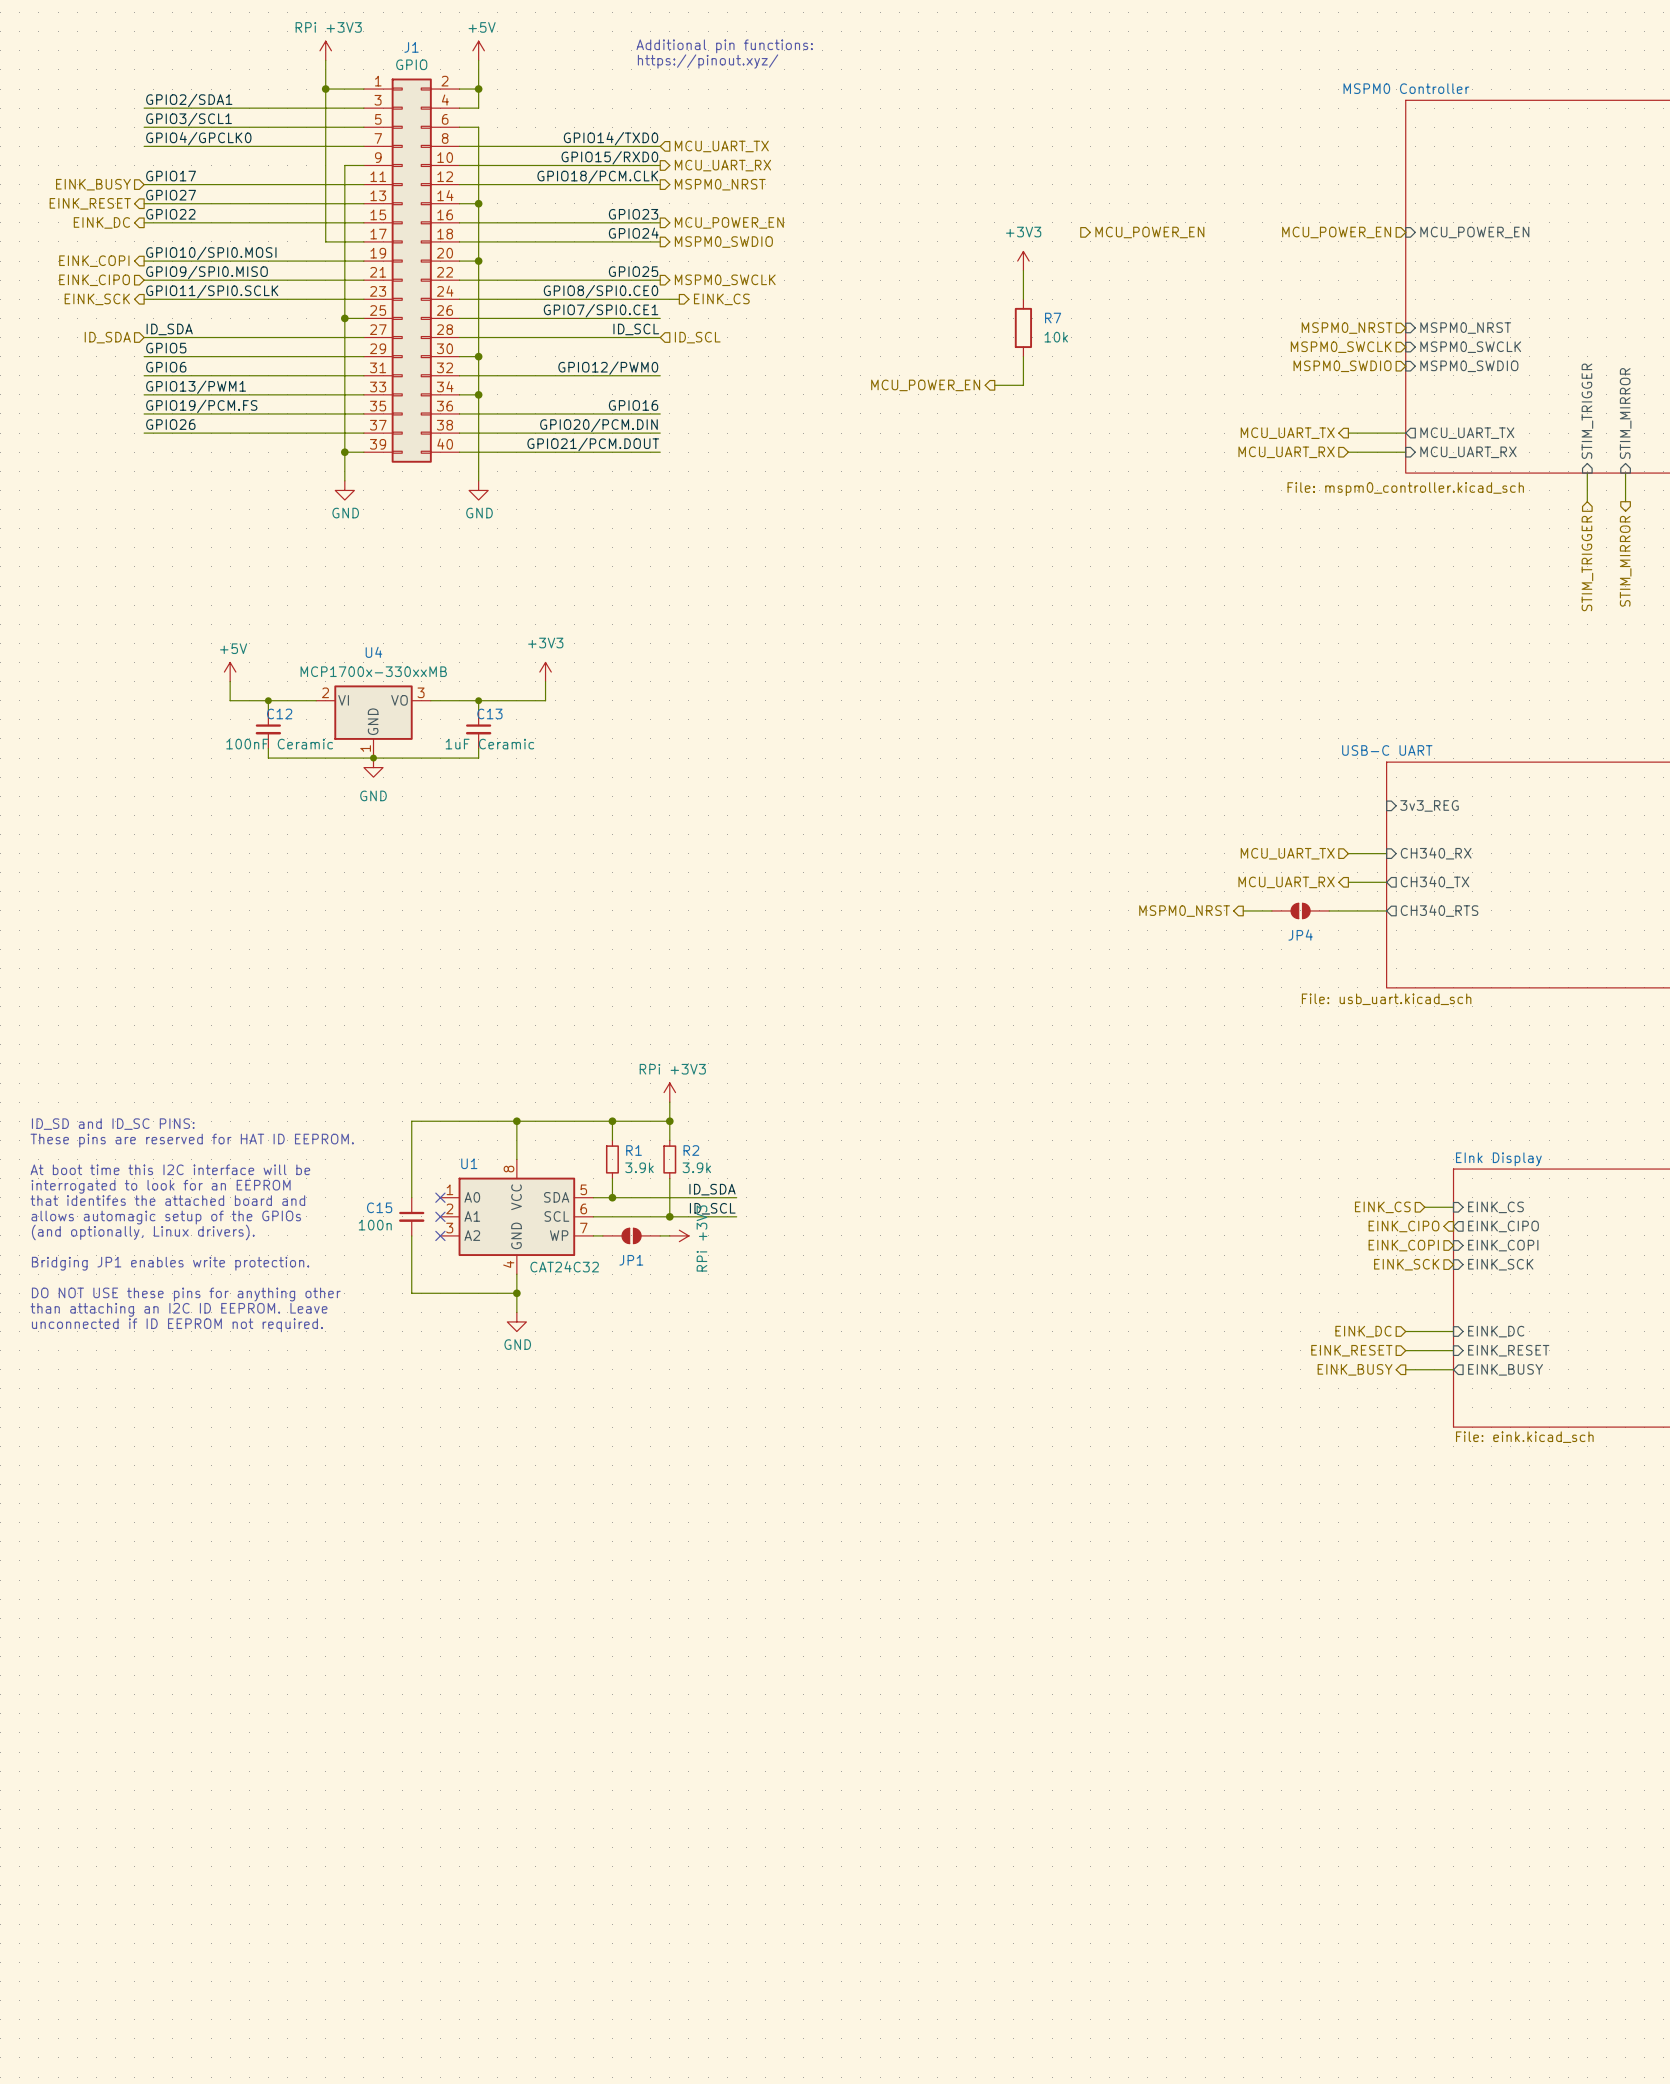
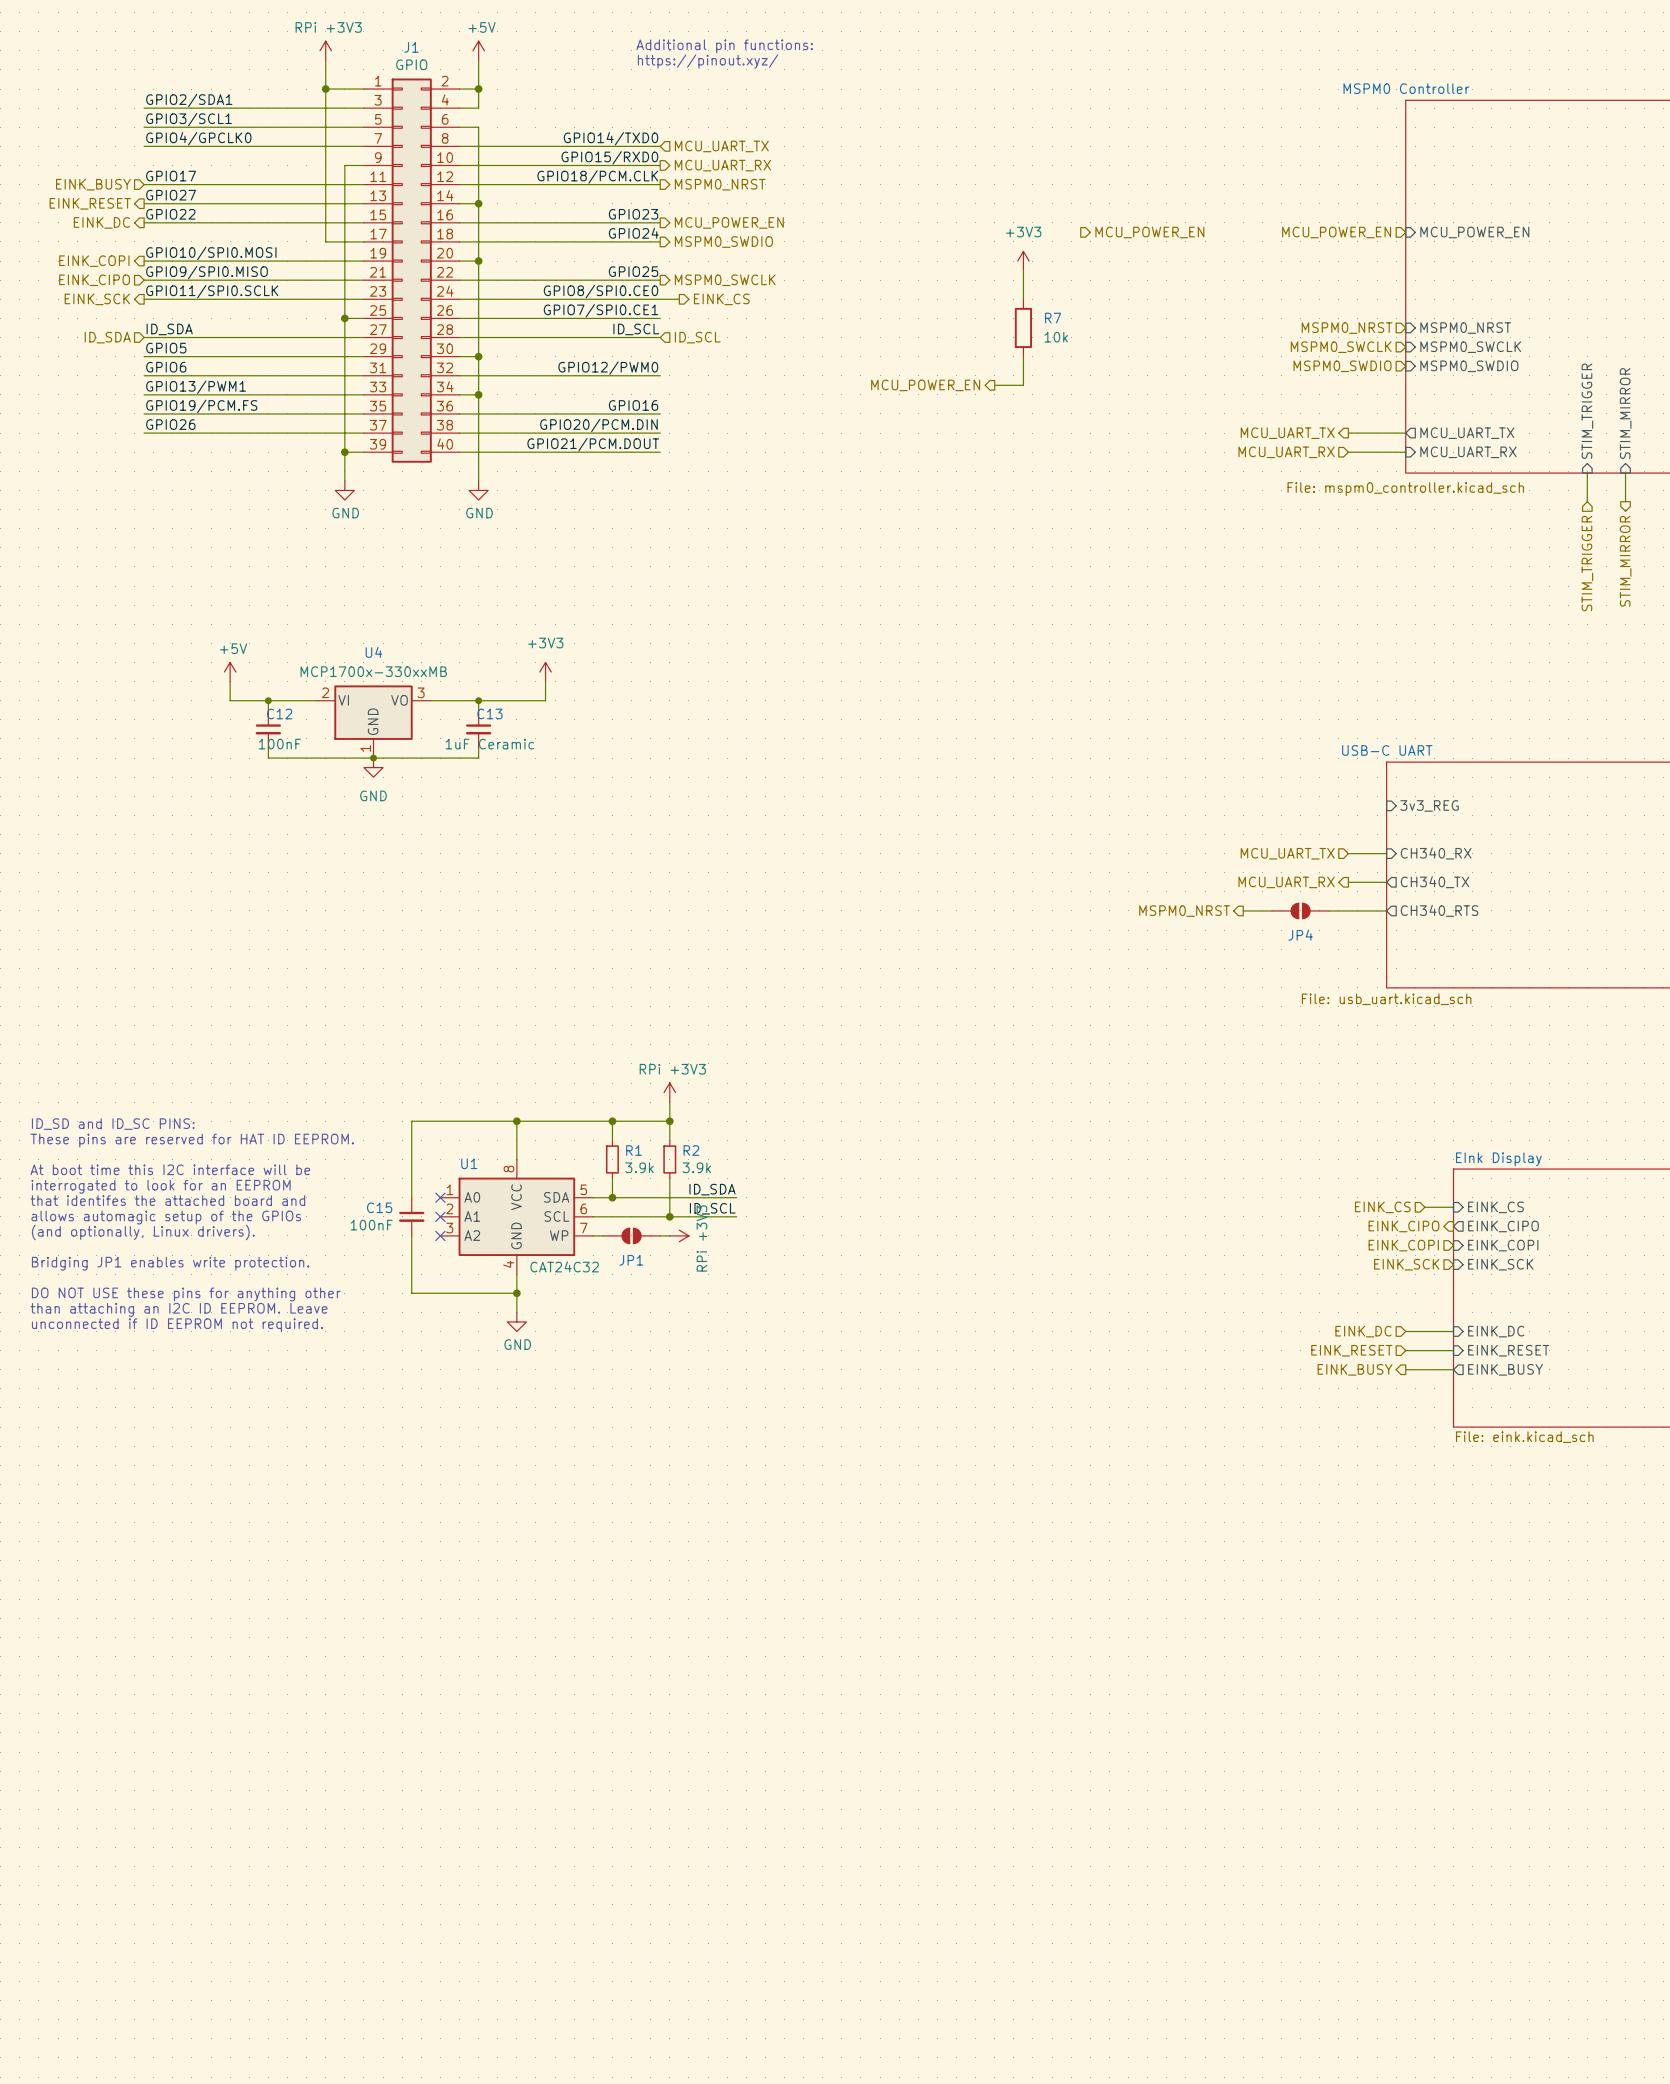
C12 value: 100nF Ceramic (279, 744) -> 100nF (279, 744)
C15 value: 100n (375, 1225) -> 100nF (371, 1225)

